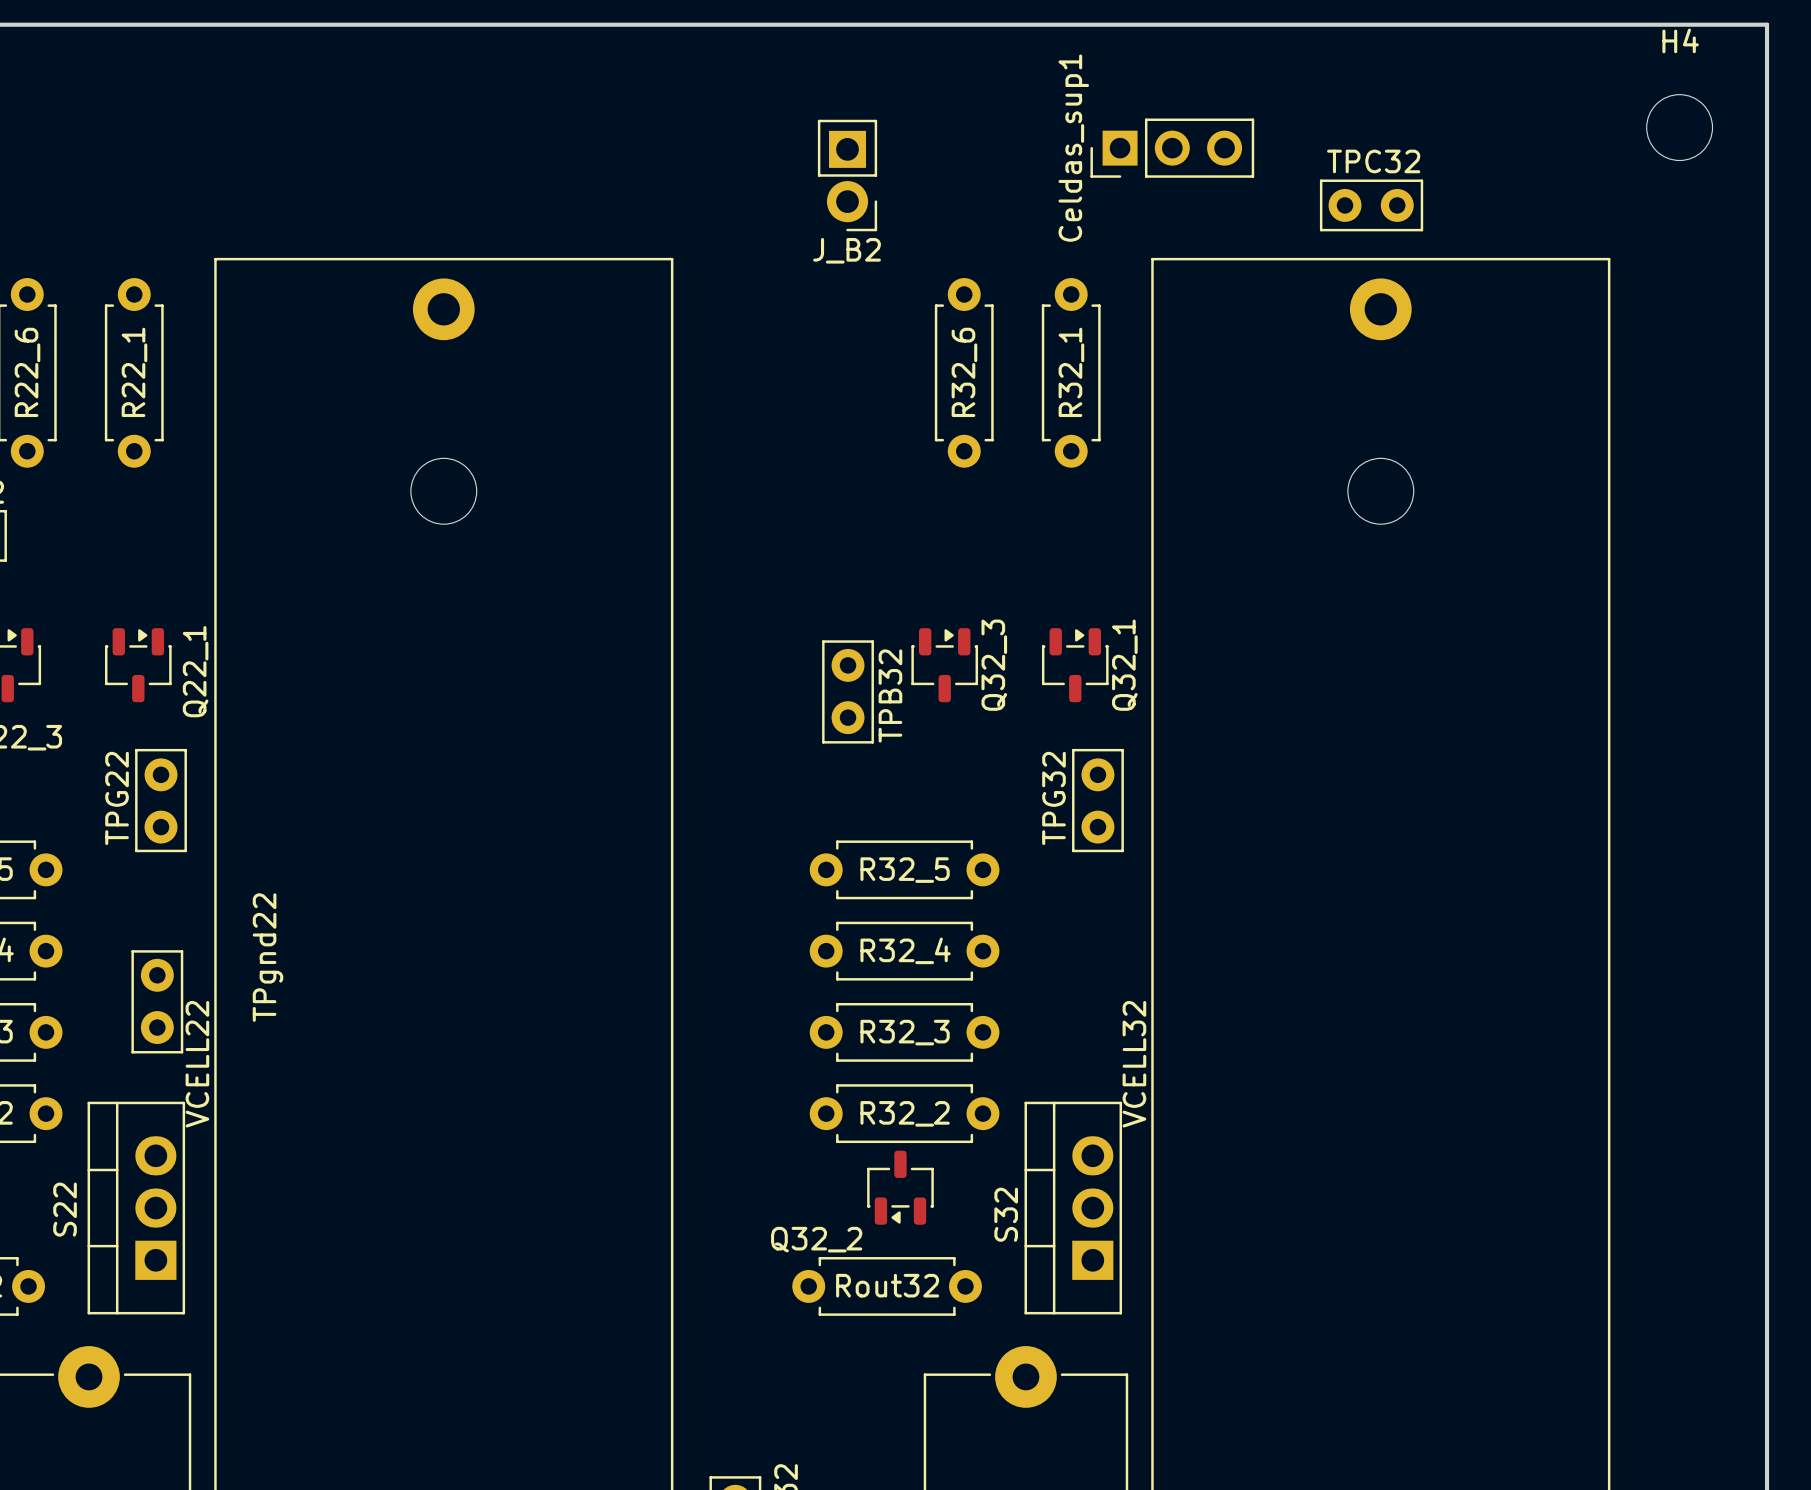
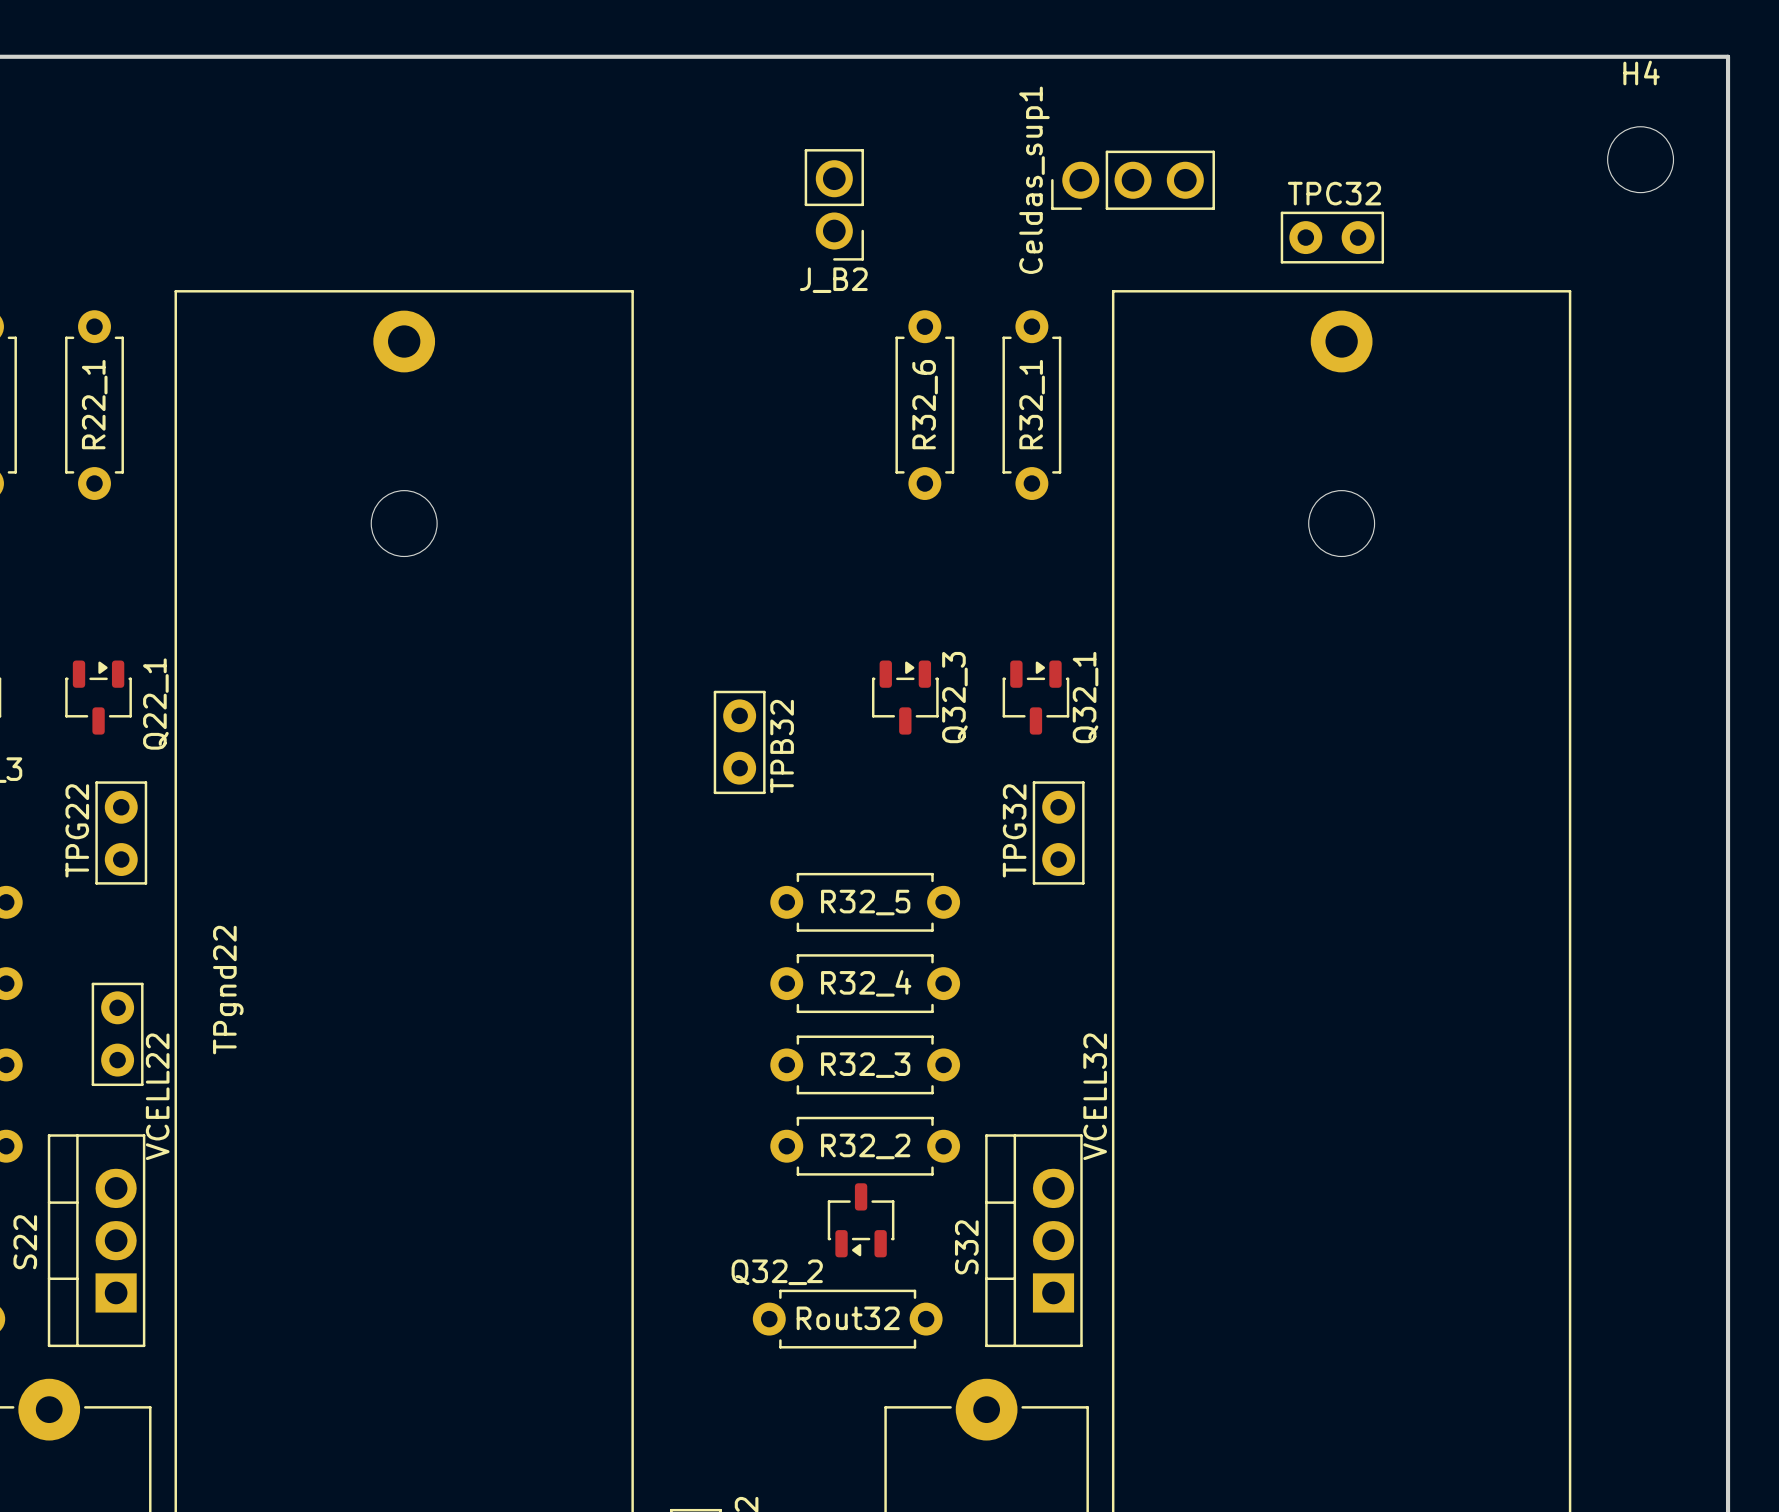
Celdas_sup1 footprint: [1090, 118, 1255, 178] -> [1051, 150, 1215, 210]
J_B2 footprint: [817, 119, 878, 232] -> [804, 149, 864, 261]
TPB32 position: (848, 691) -> (739, 742)

